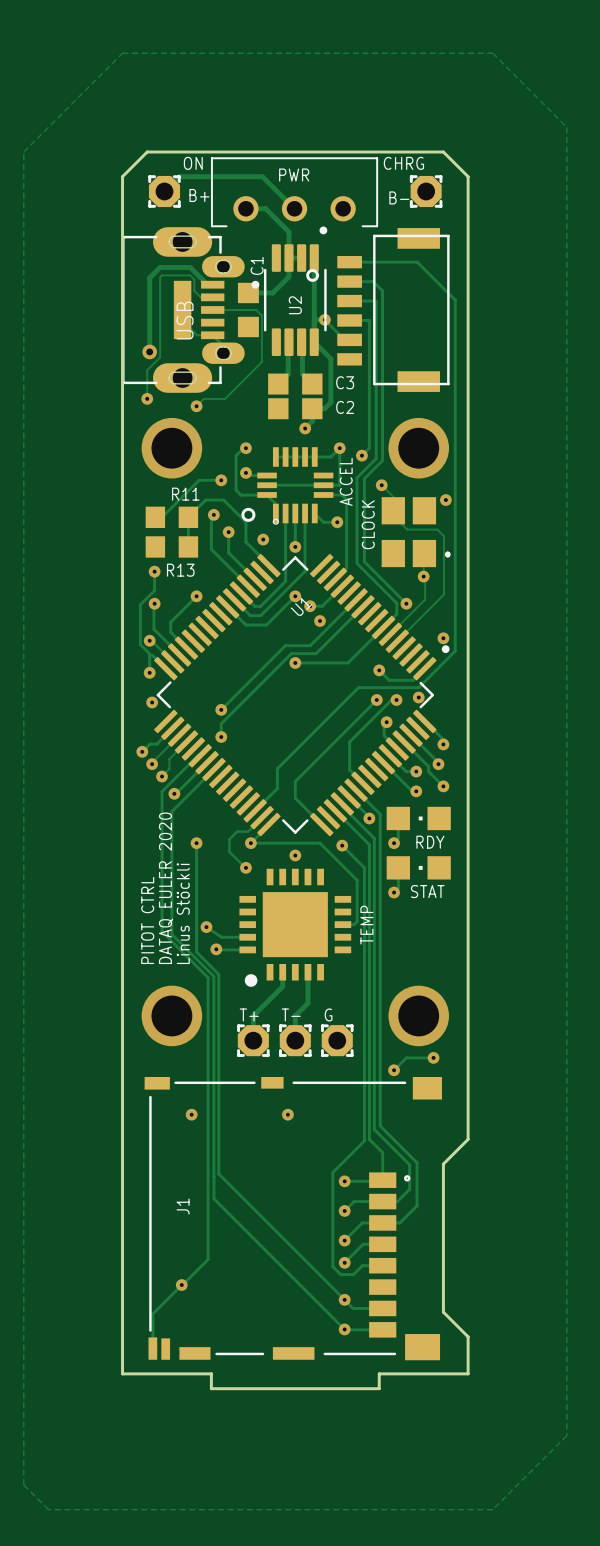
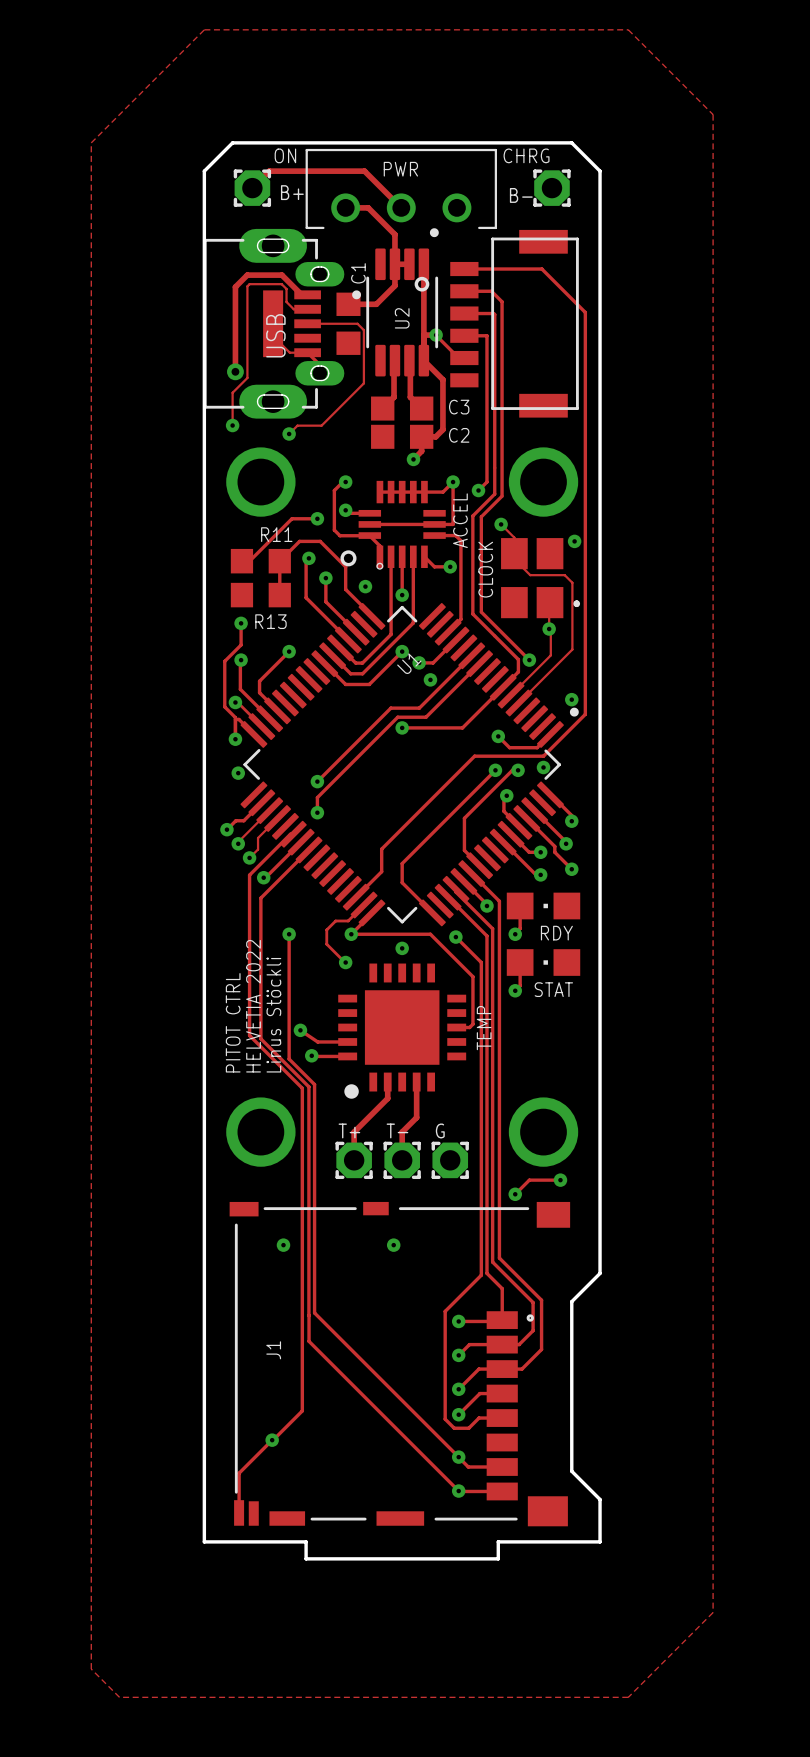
text: DATAQ EULER 2020 (166, 888) -> HELVETIA 2022 (253, 1006)

